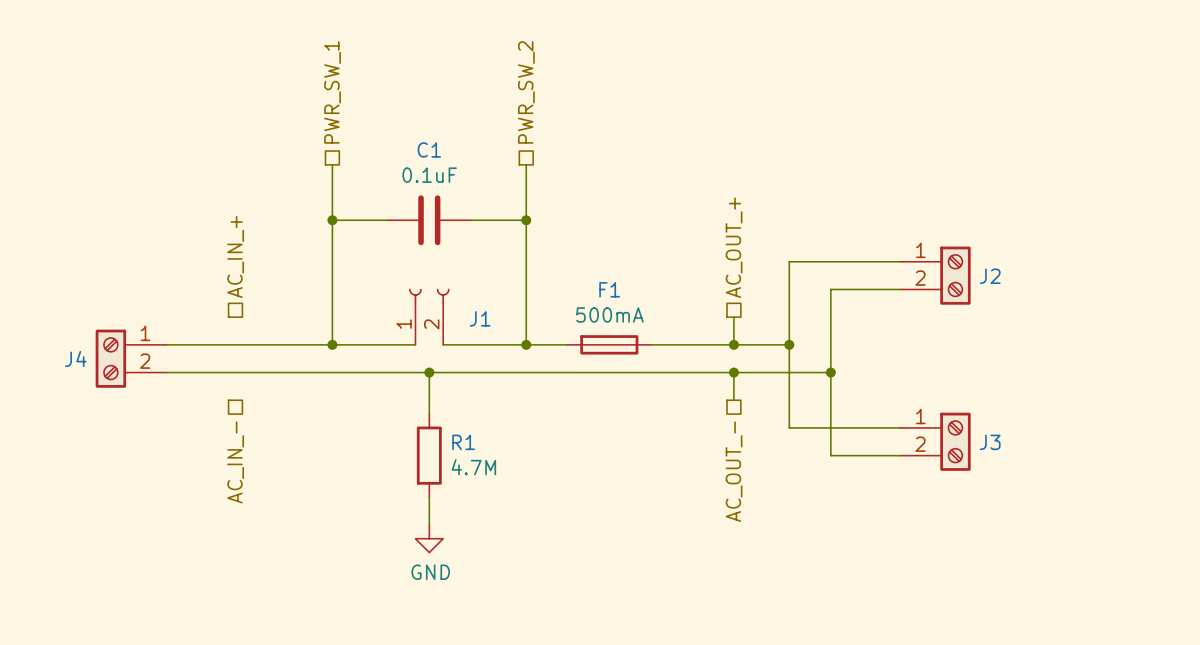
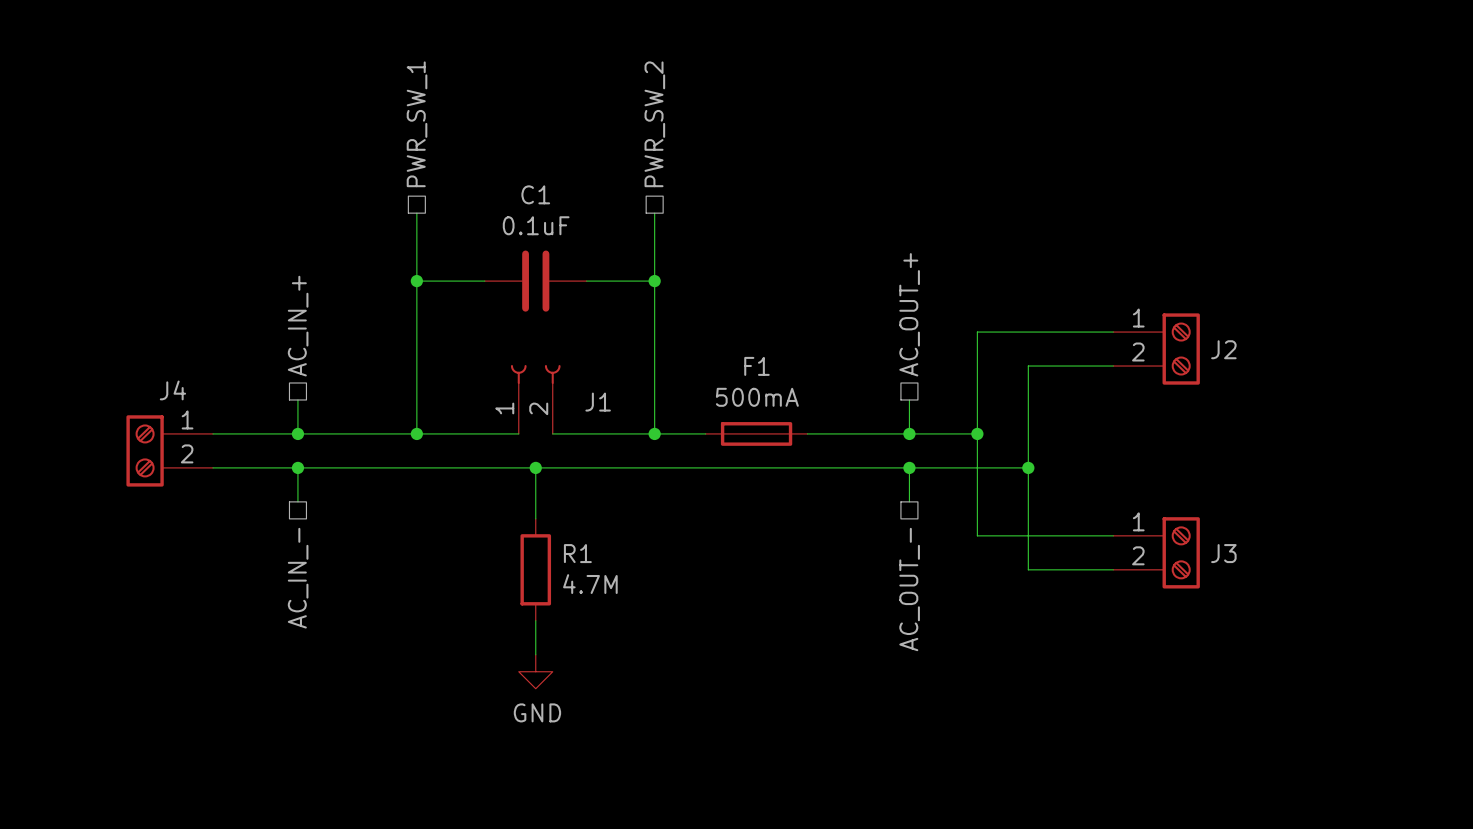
wire: none -> (297, 399) (297, 433)
junction: none -> (297, 433)
J4 name position: J4 (75, 358) -> J4 (172, 390)
wire: none -> (297, 467) (297, 501)
junction: none -> (297, 467)

